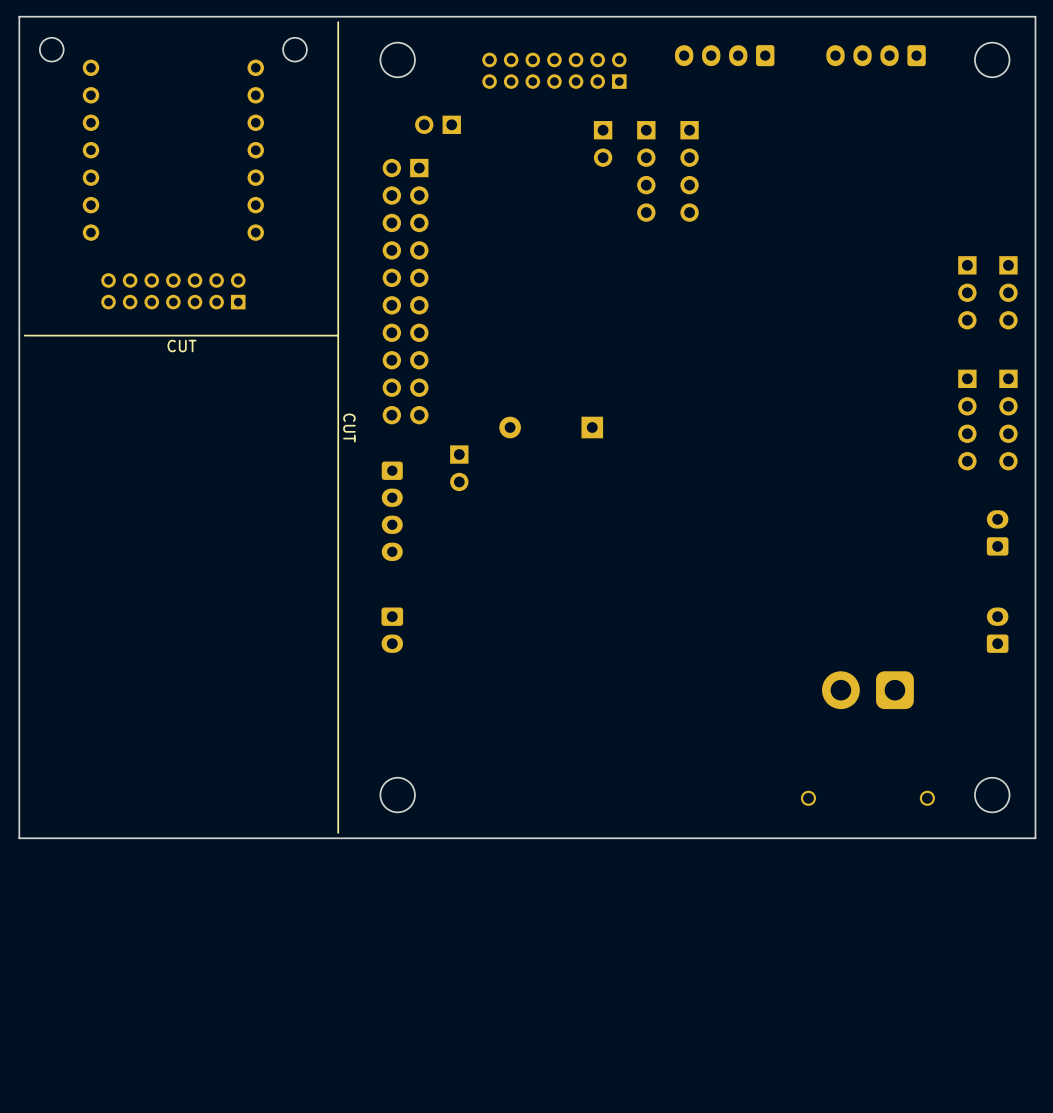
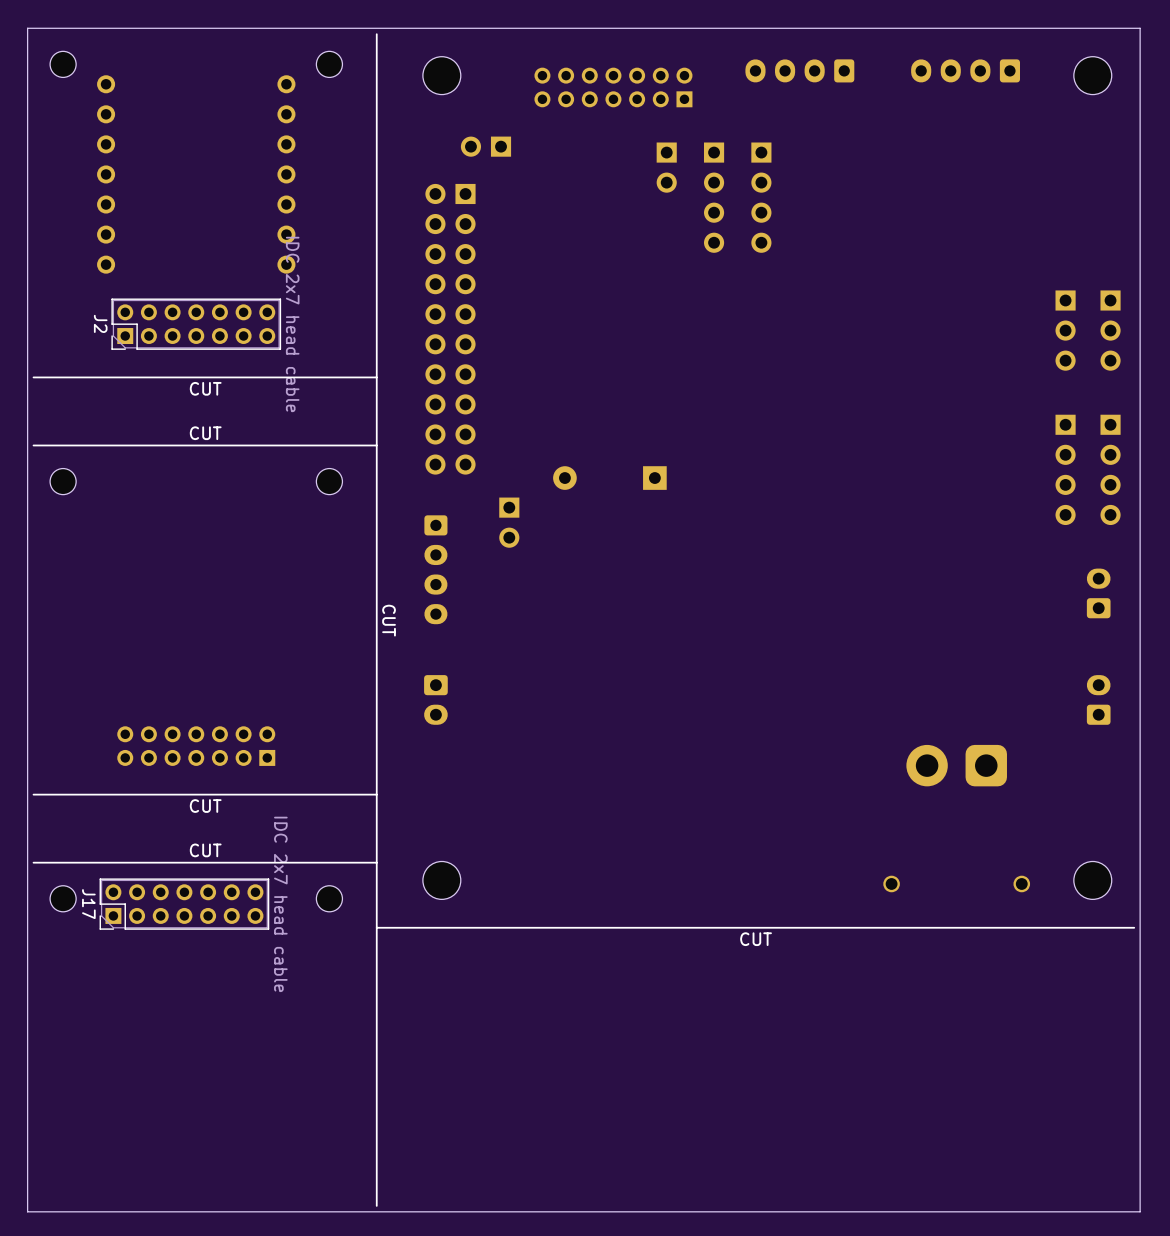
J2 side: top (173, 291) -> bottom (196, 324)
text: none -> CUT (205, 433)
line: none -> (376, 445) (33, 445)
text: CUT (349, 428) -> none
part: none -> (63, 481)
part: none -> (329, 481)
text: none -> CUT (389, 620)
part: none -> (196, 746)
line: none -> (376, 794) (33, 794)
text: none -> CUT (205, 806)
text: none -> CUT (205, 850)
line: none -> (376, 862) (33, 862)
part: none -> (63, 898)
part: none -> (329, 898)
J17: none -> IDC 2x7 head cable (184, 904)
line: none -> (376, 921) (376, 1205)
line: none -> (1134, 927) (376, 927)
board edge: (1035, 838) (19, 838) -> (1140, 927) (1140, 1211) (27, 1211) (27, 927)
text: none -> CUT (756, 939)

